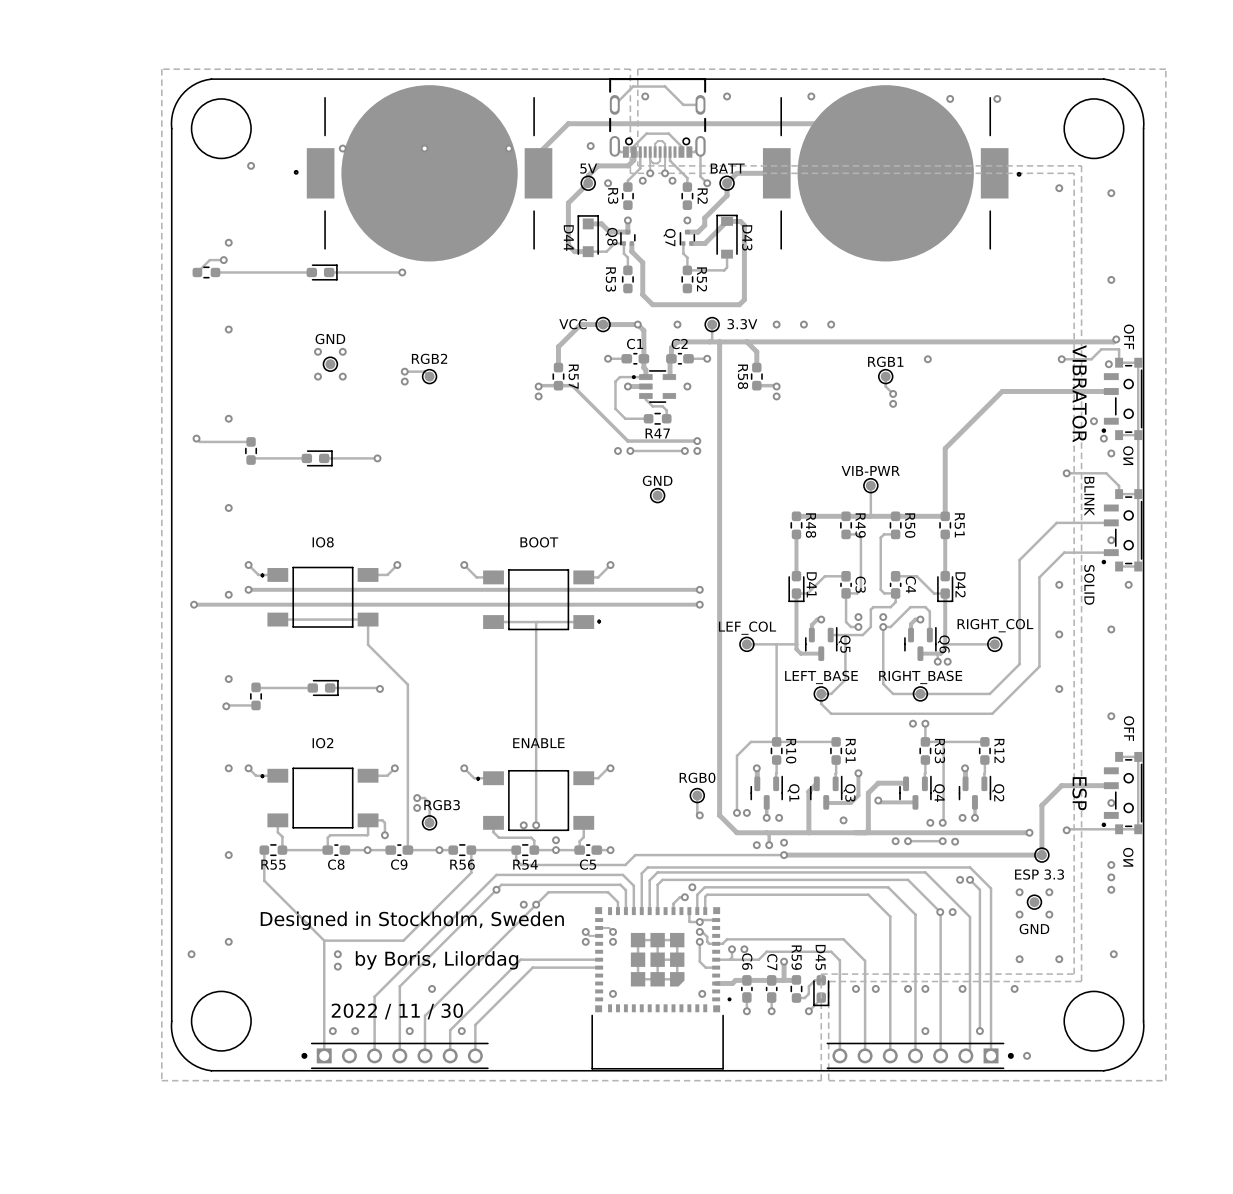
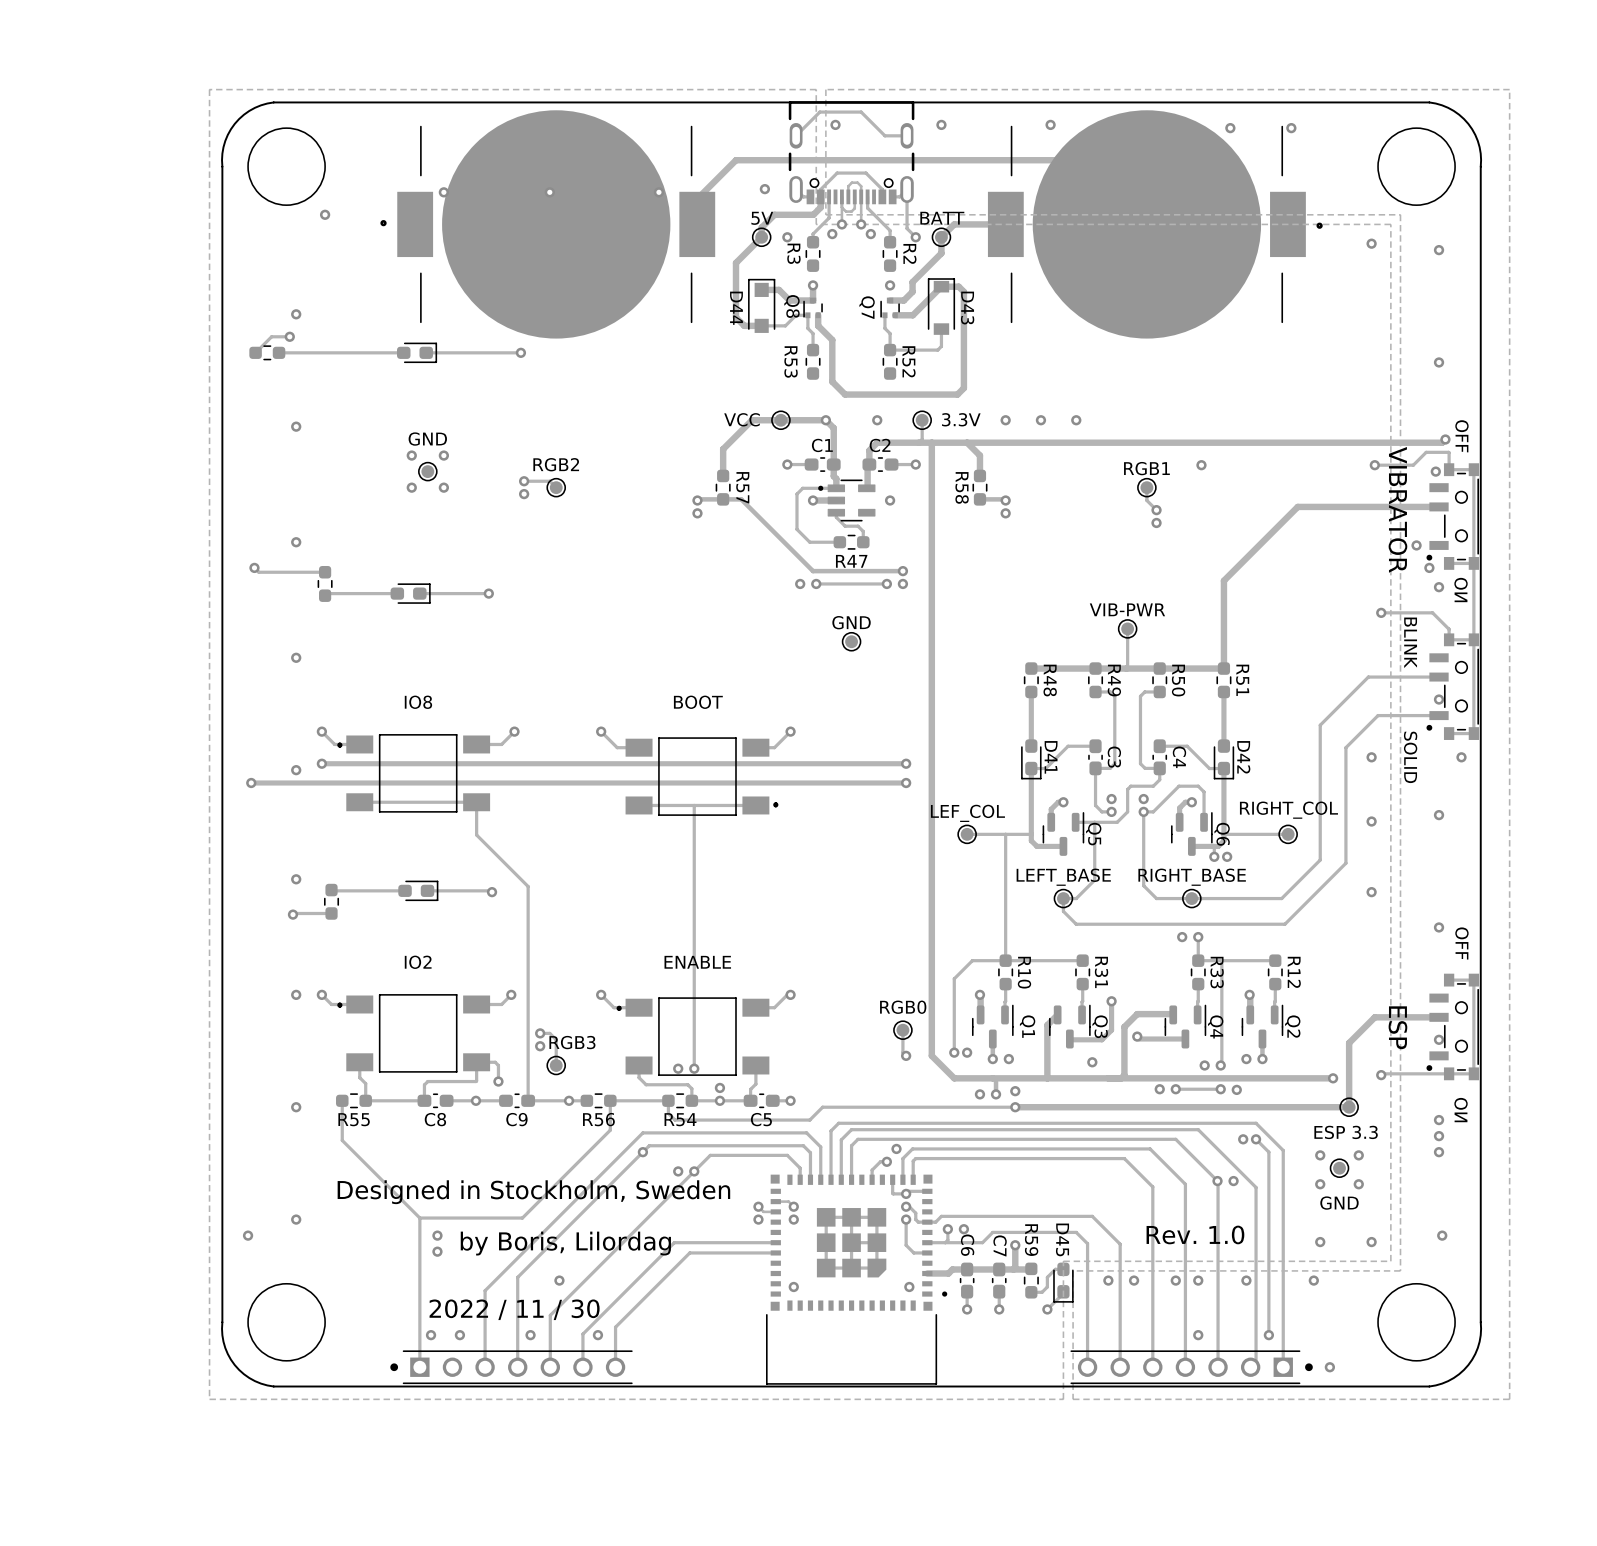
text: none -> Rev. 1.0 (1195, 1234)

